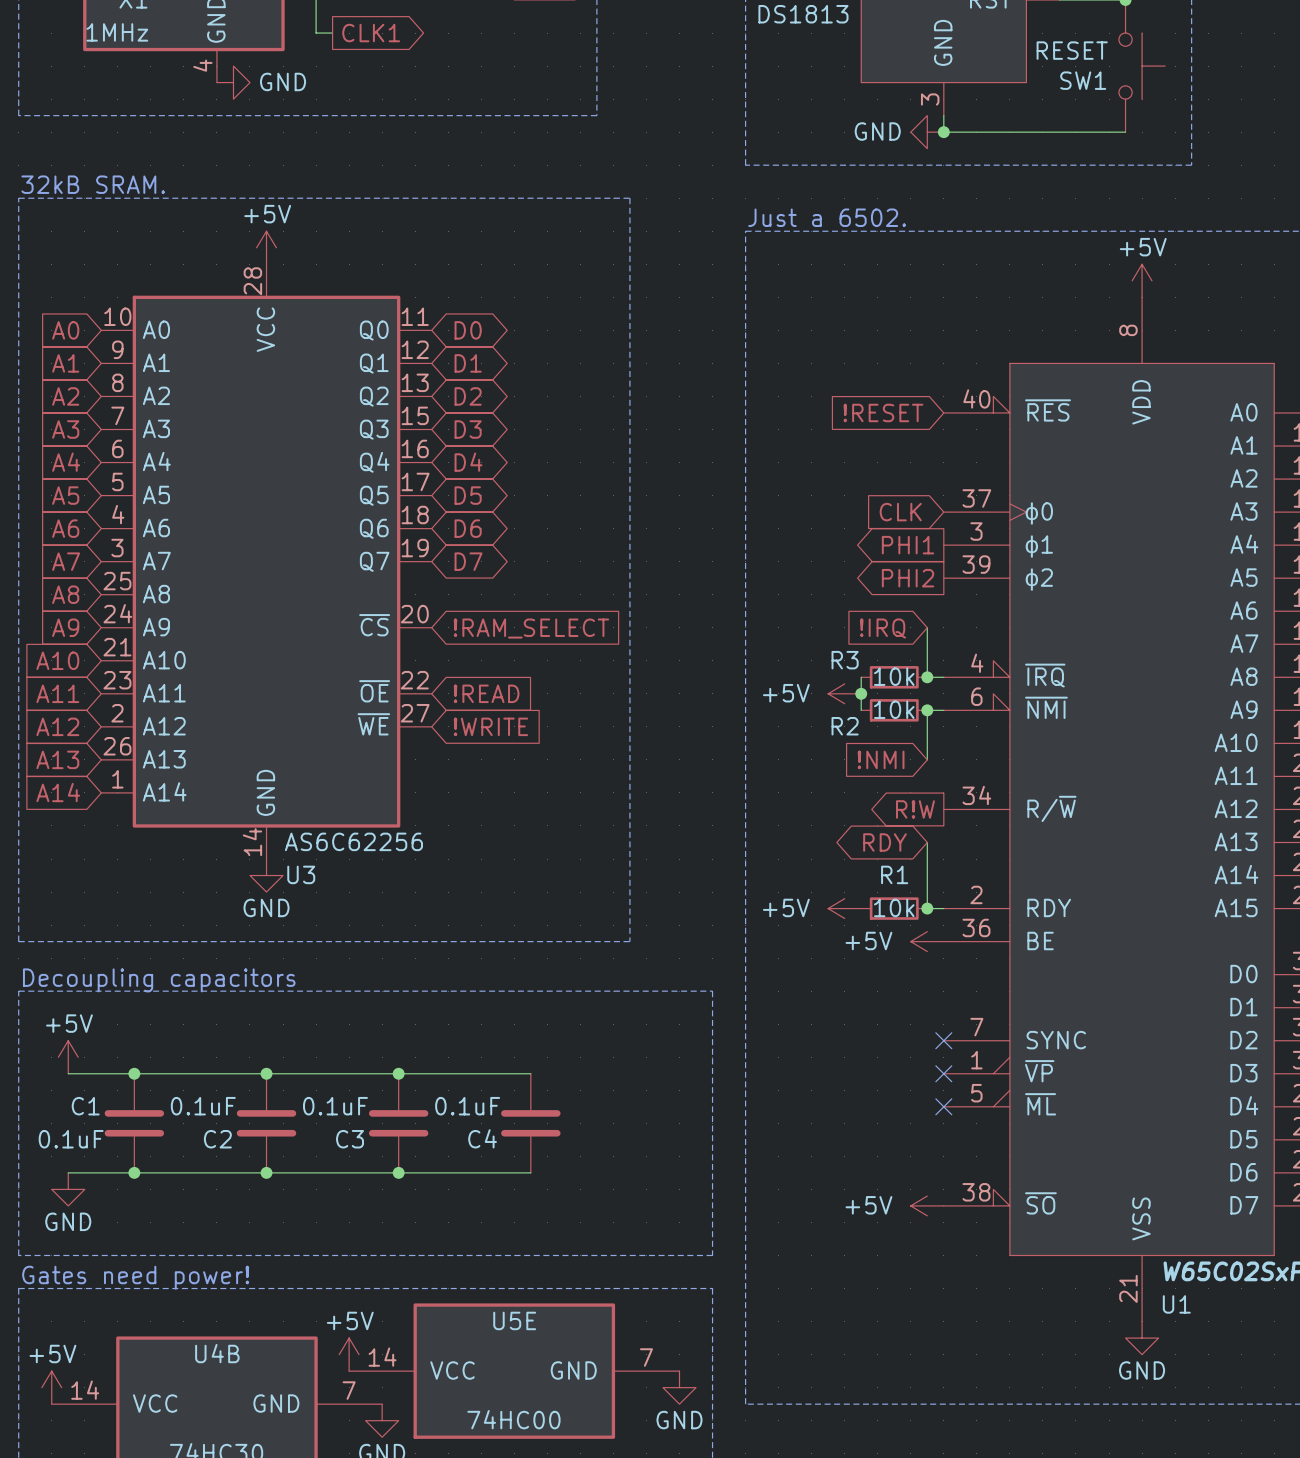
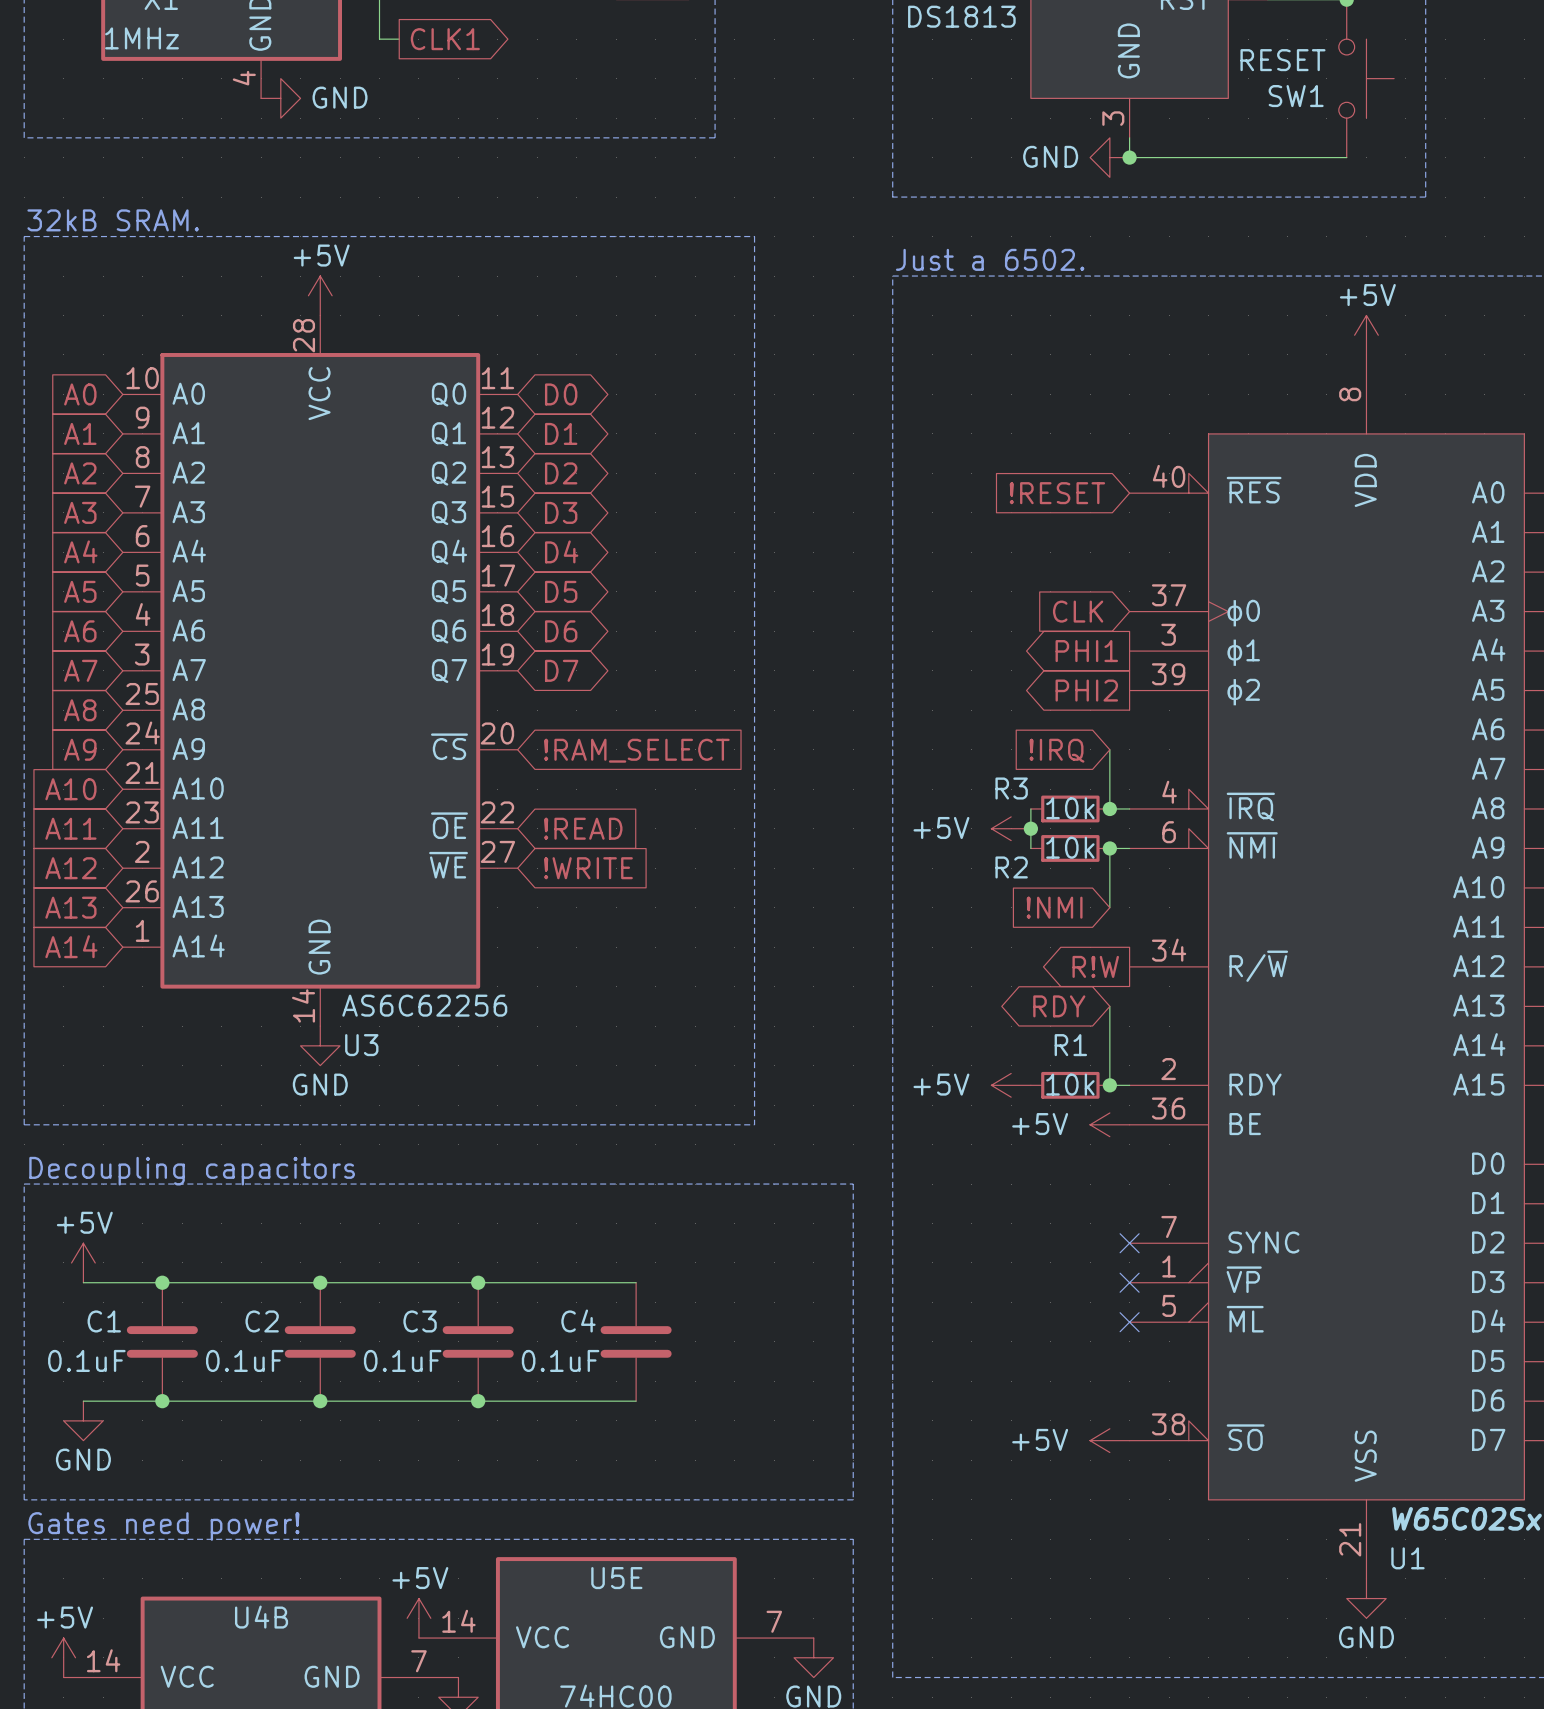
C2 value position: 0.1uF (203, 1106) -> 0.1uF (244, 1360)
C3 value position: 0.1uF (335, 1106) -> 0.1uF (402, 1360)
C4 value position: 0.1uF (467, 1106) -> 0.1uF (560, 1360)
C4 name position: C4 (482, 1138) -> C4 (578, 1321)
C2 name position: C2 (217, 1139) -> C2 (262, 1321)
C3 name position: C3 (350, 1139) -> C3 (420, 1321)

